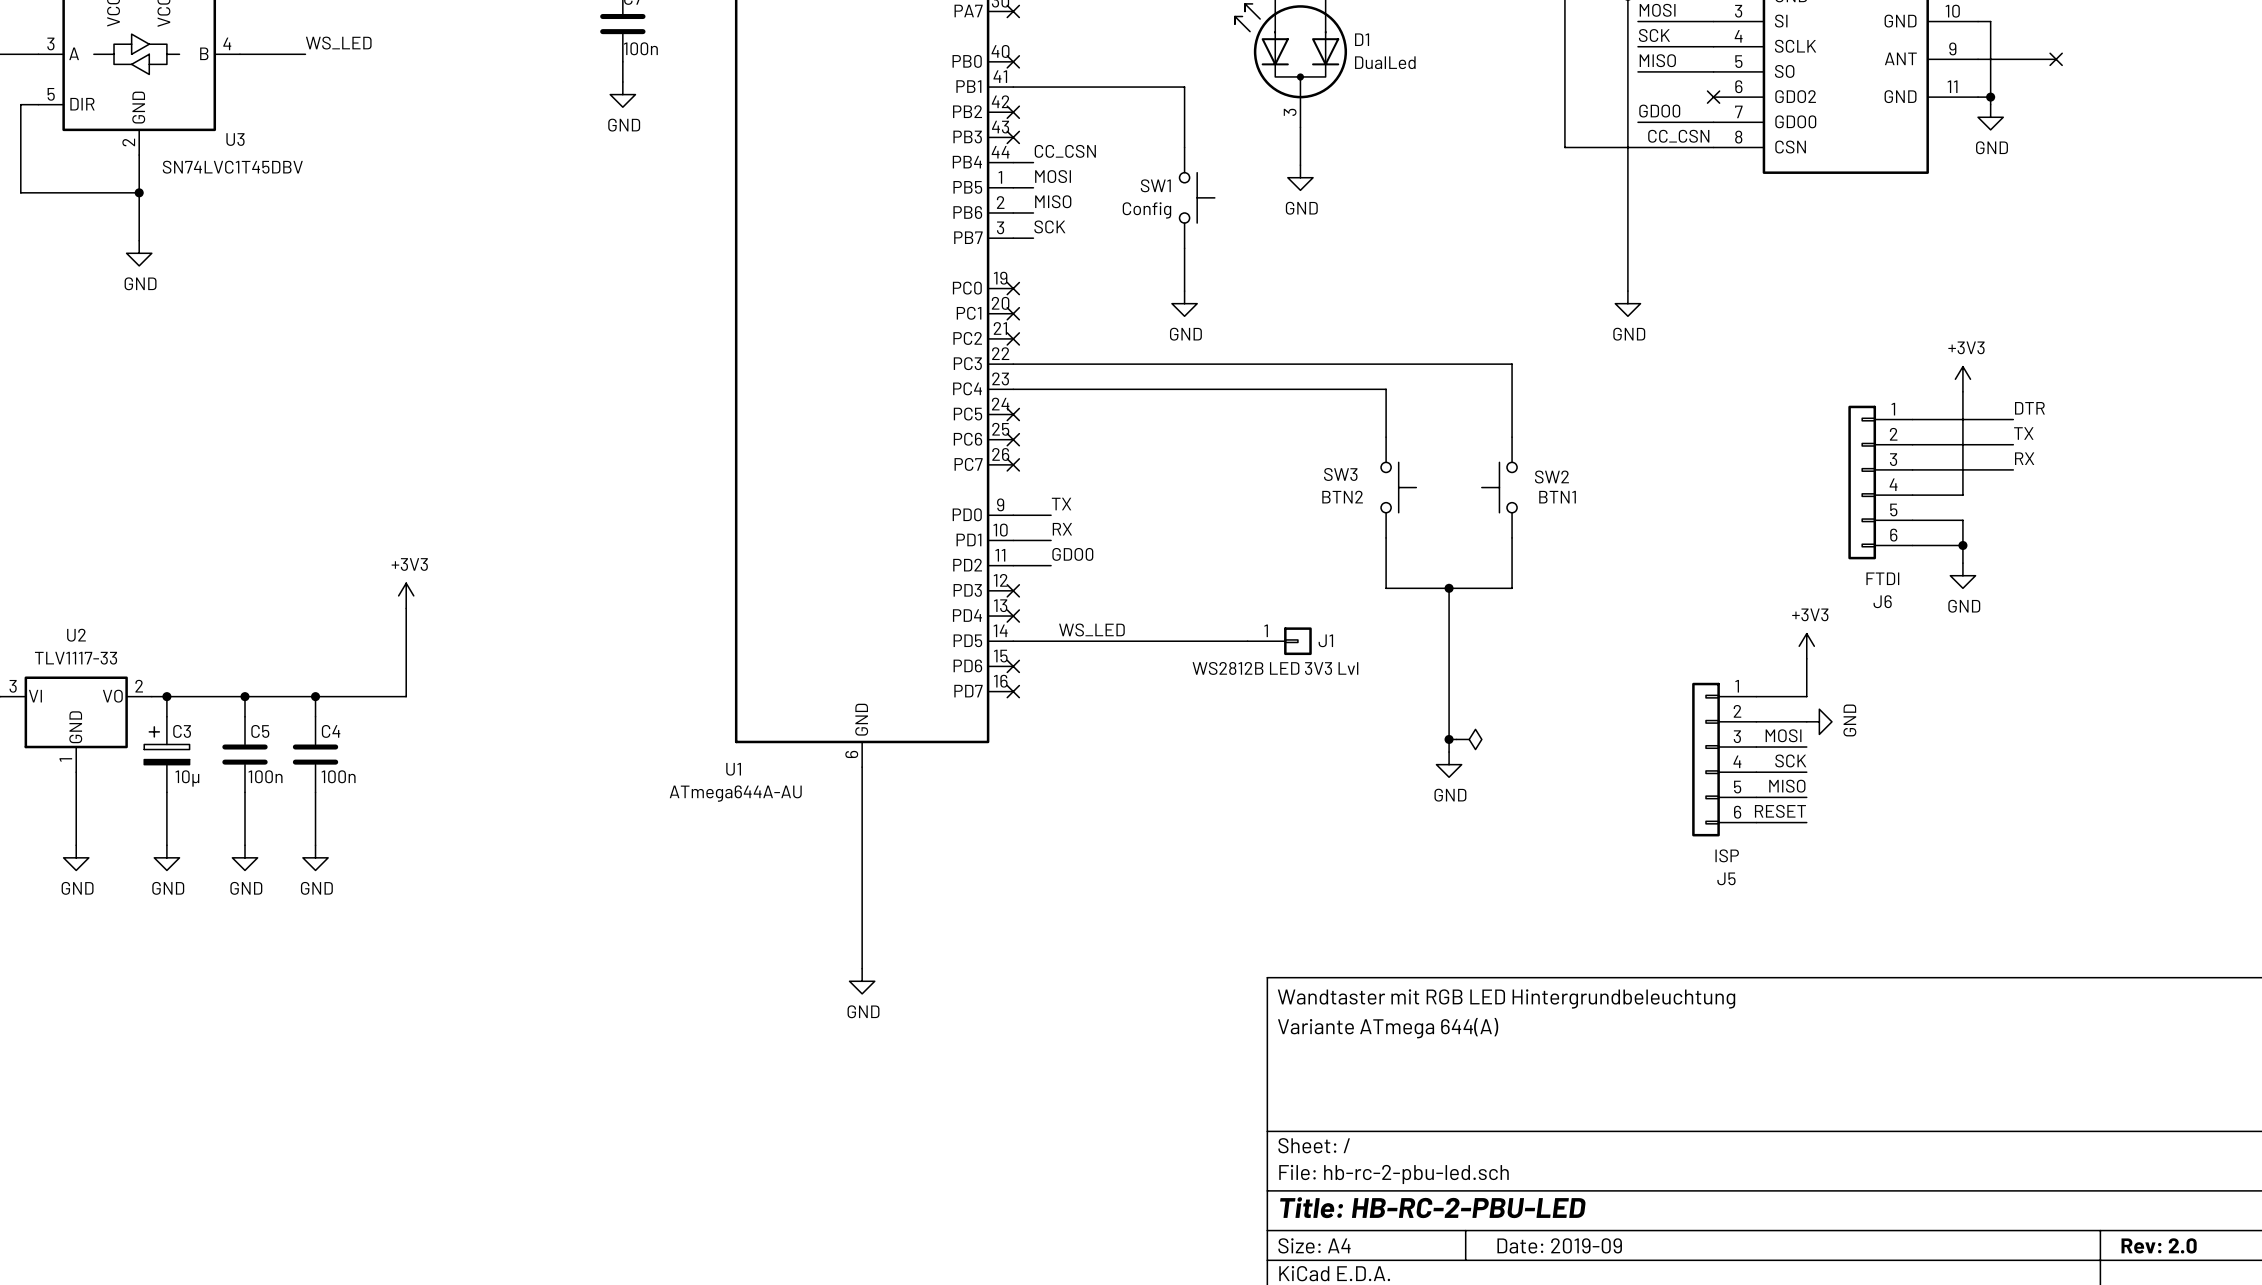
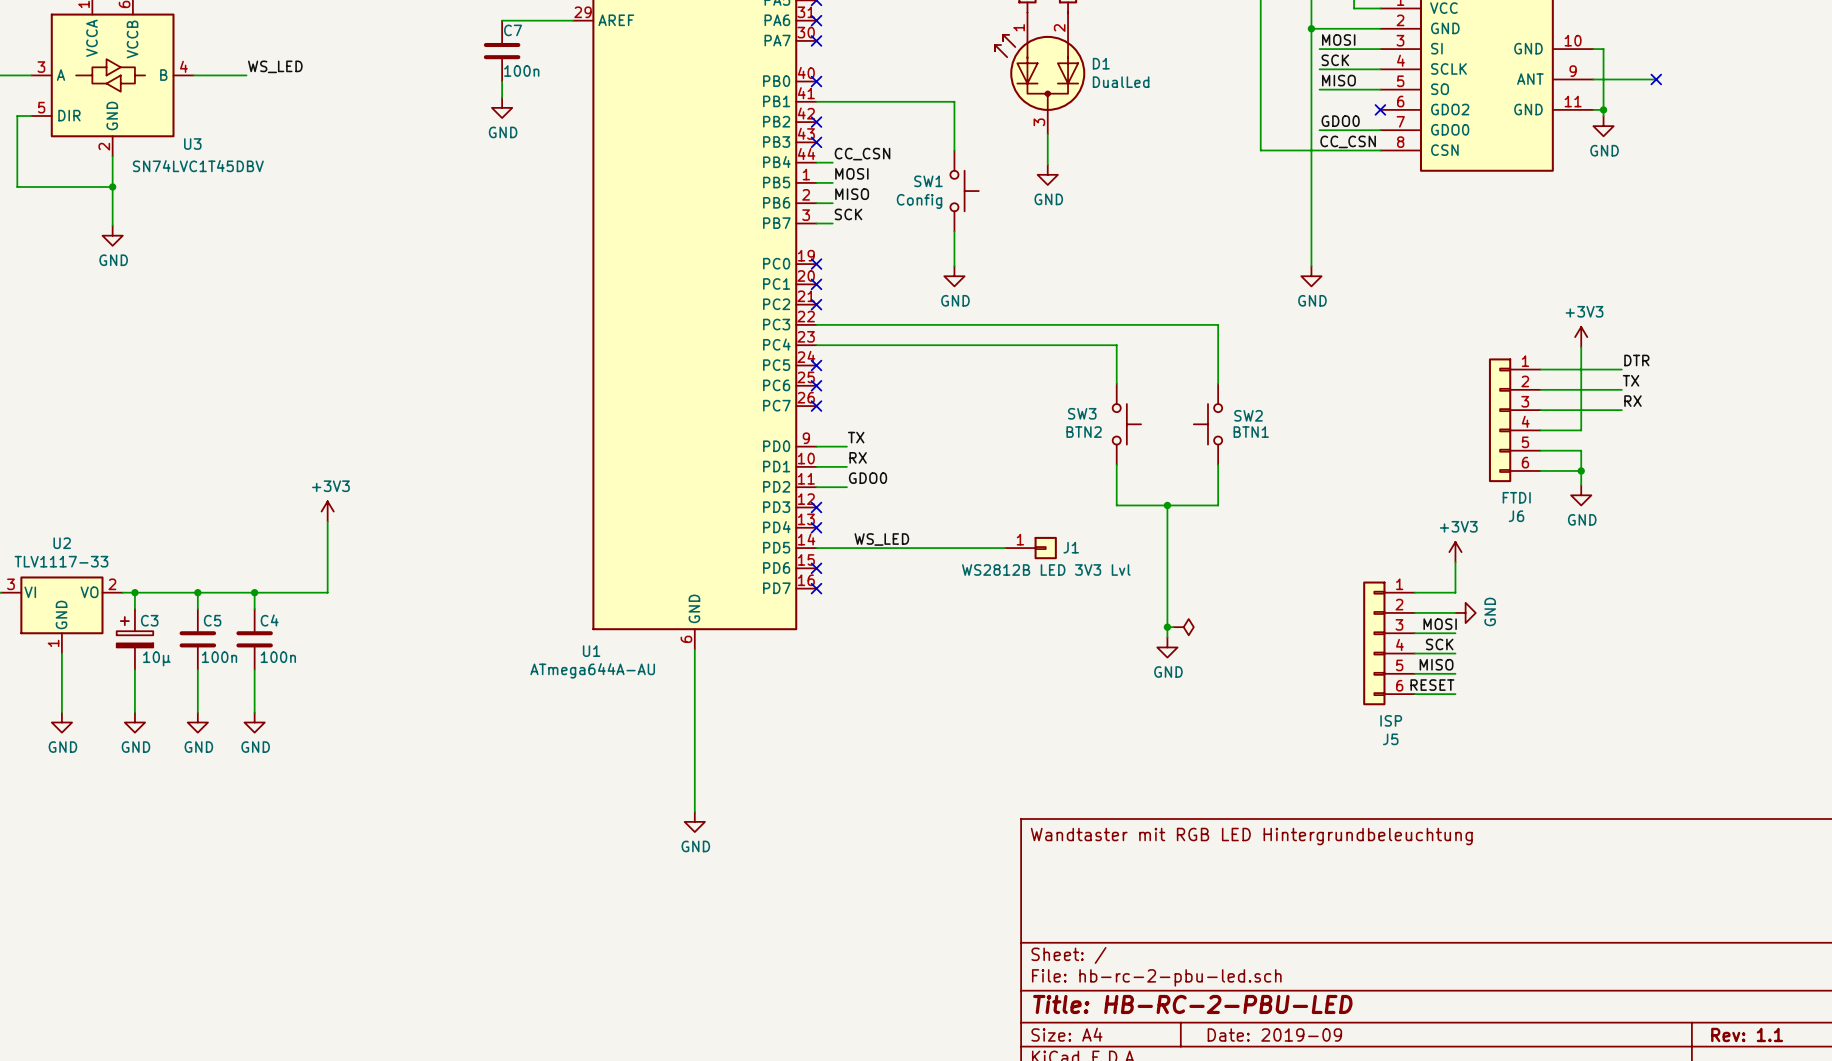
title block: Variante ATmega 644(A) (1388, 1028) -> none
title block: Rev: 2.0 (2159, 1245) -> Rev: 1.1 (1747, 1034)

